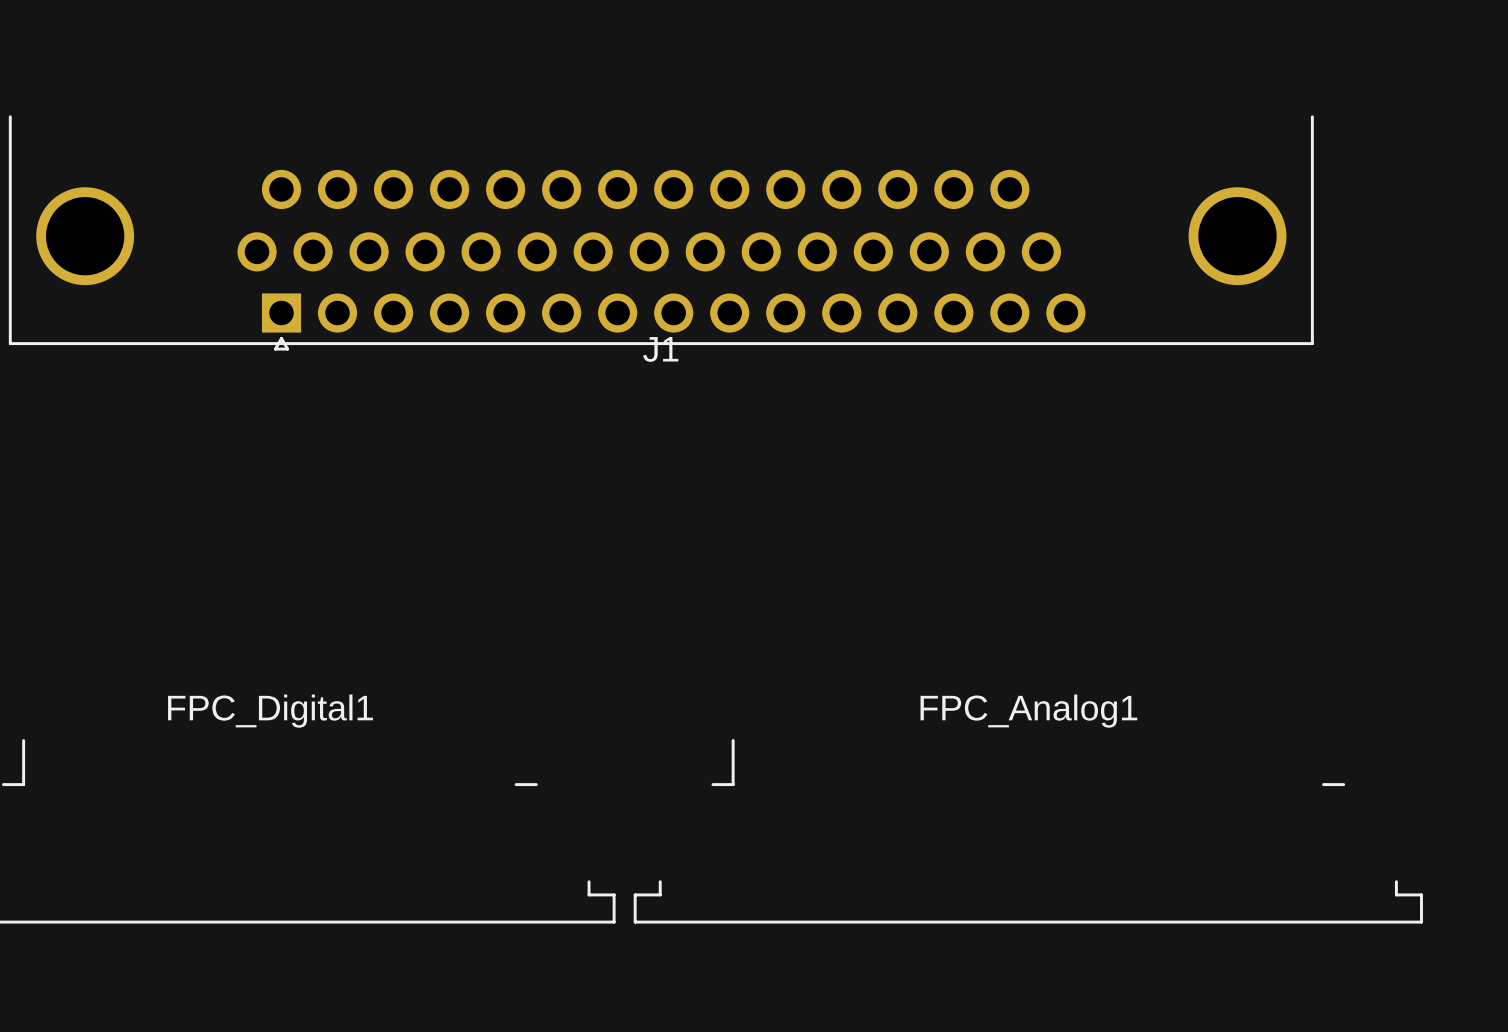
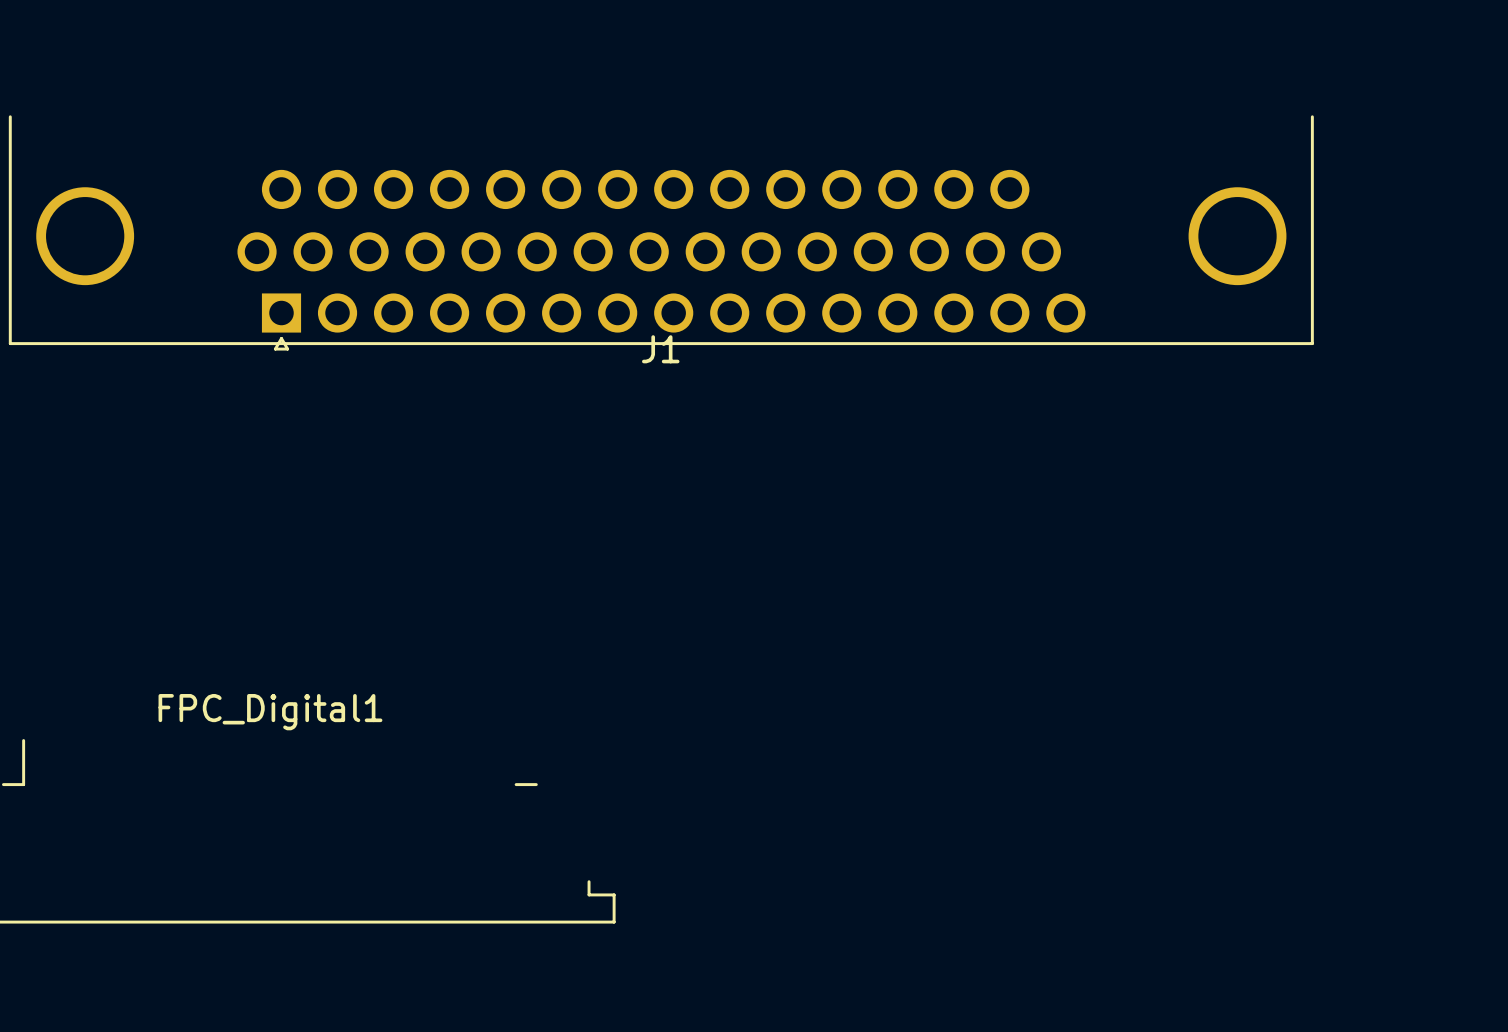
FPC_Analog1: (1028, 831) -> none

